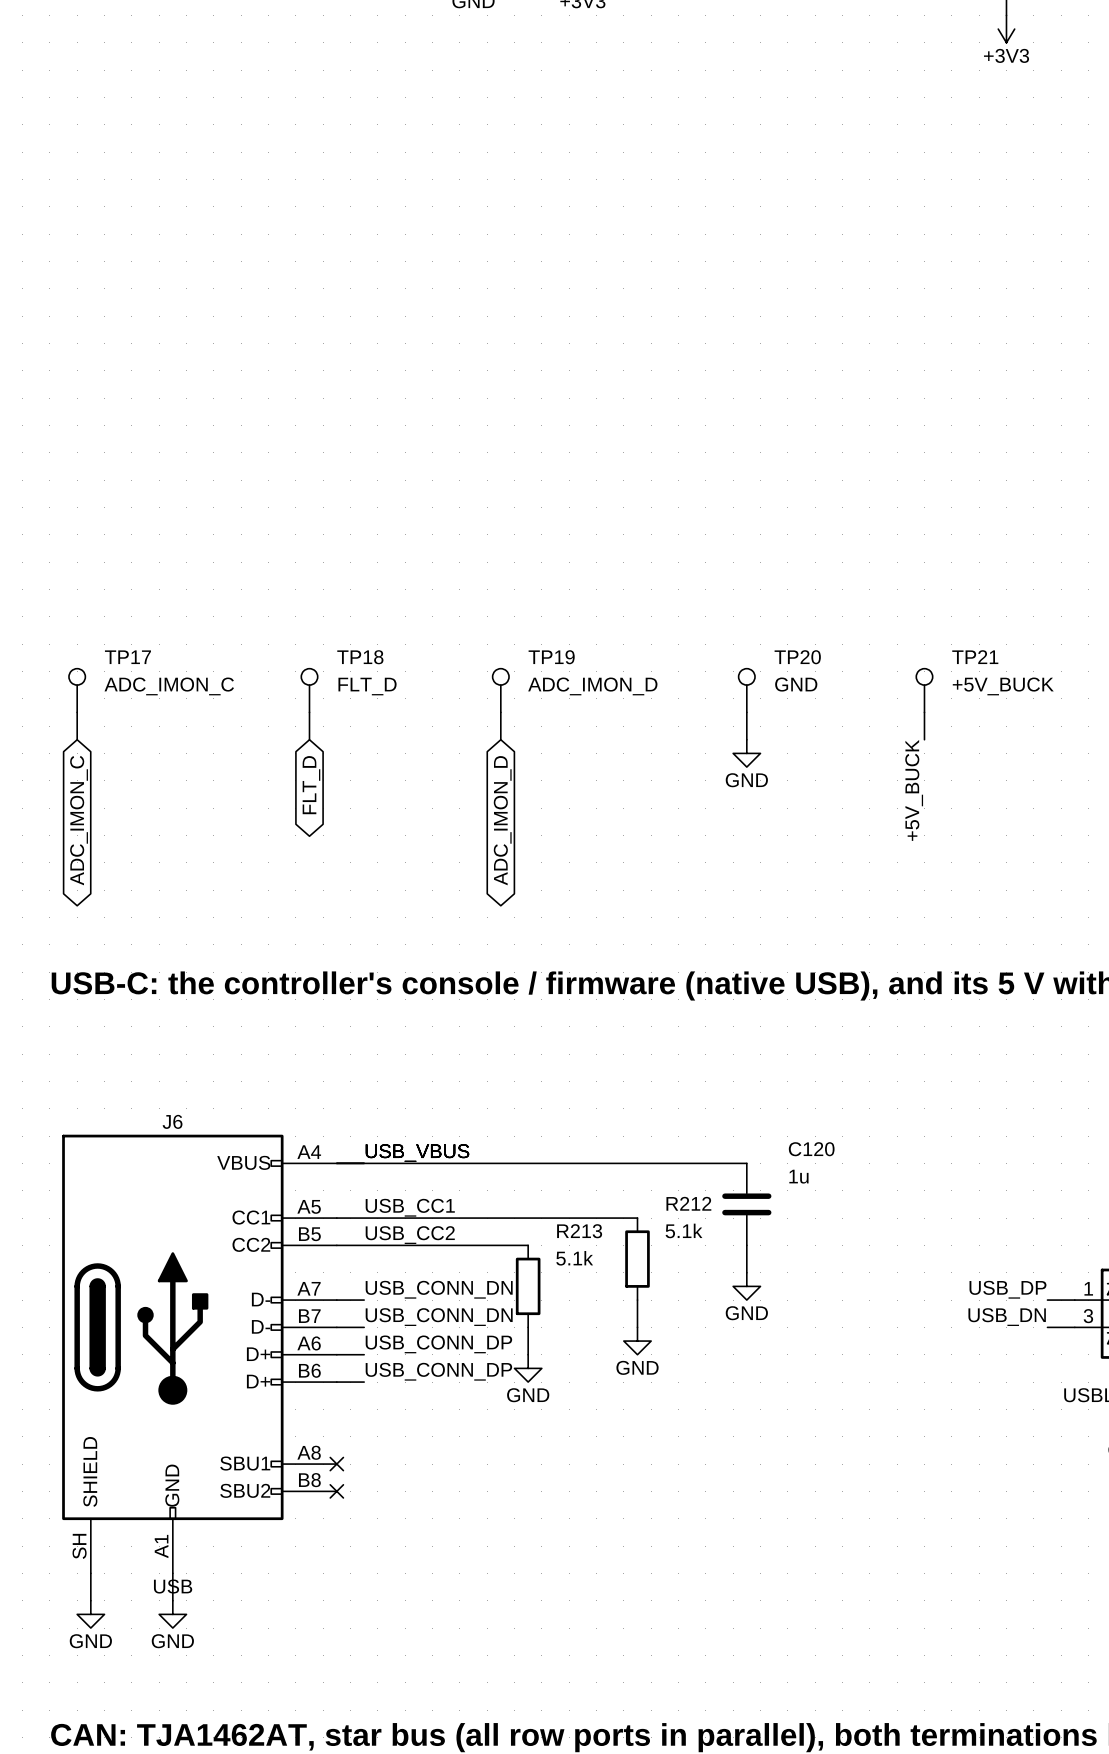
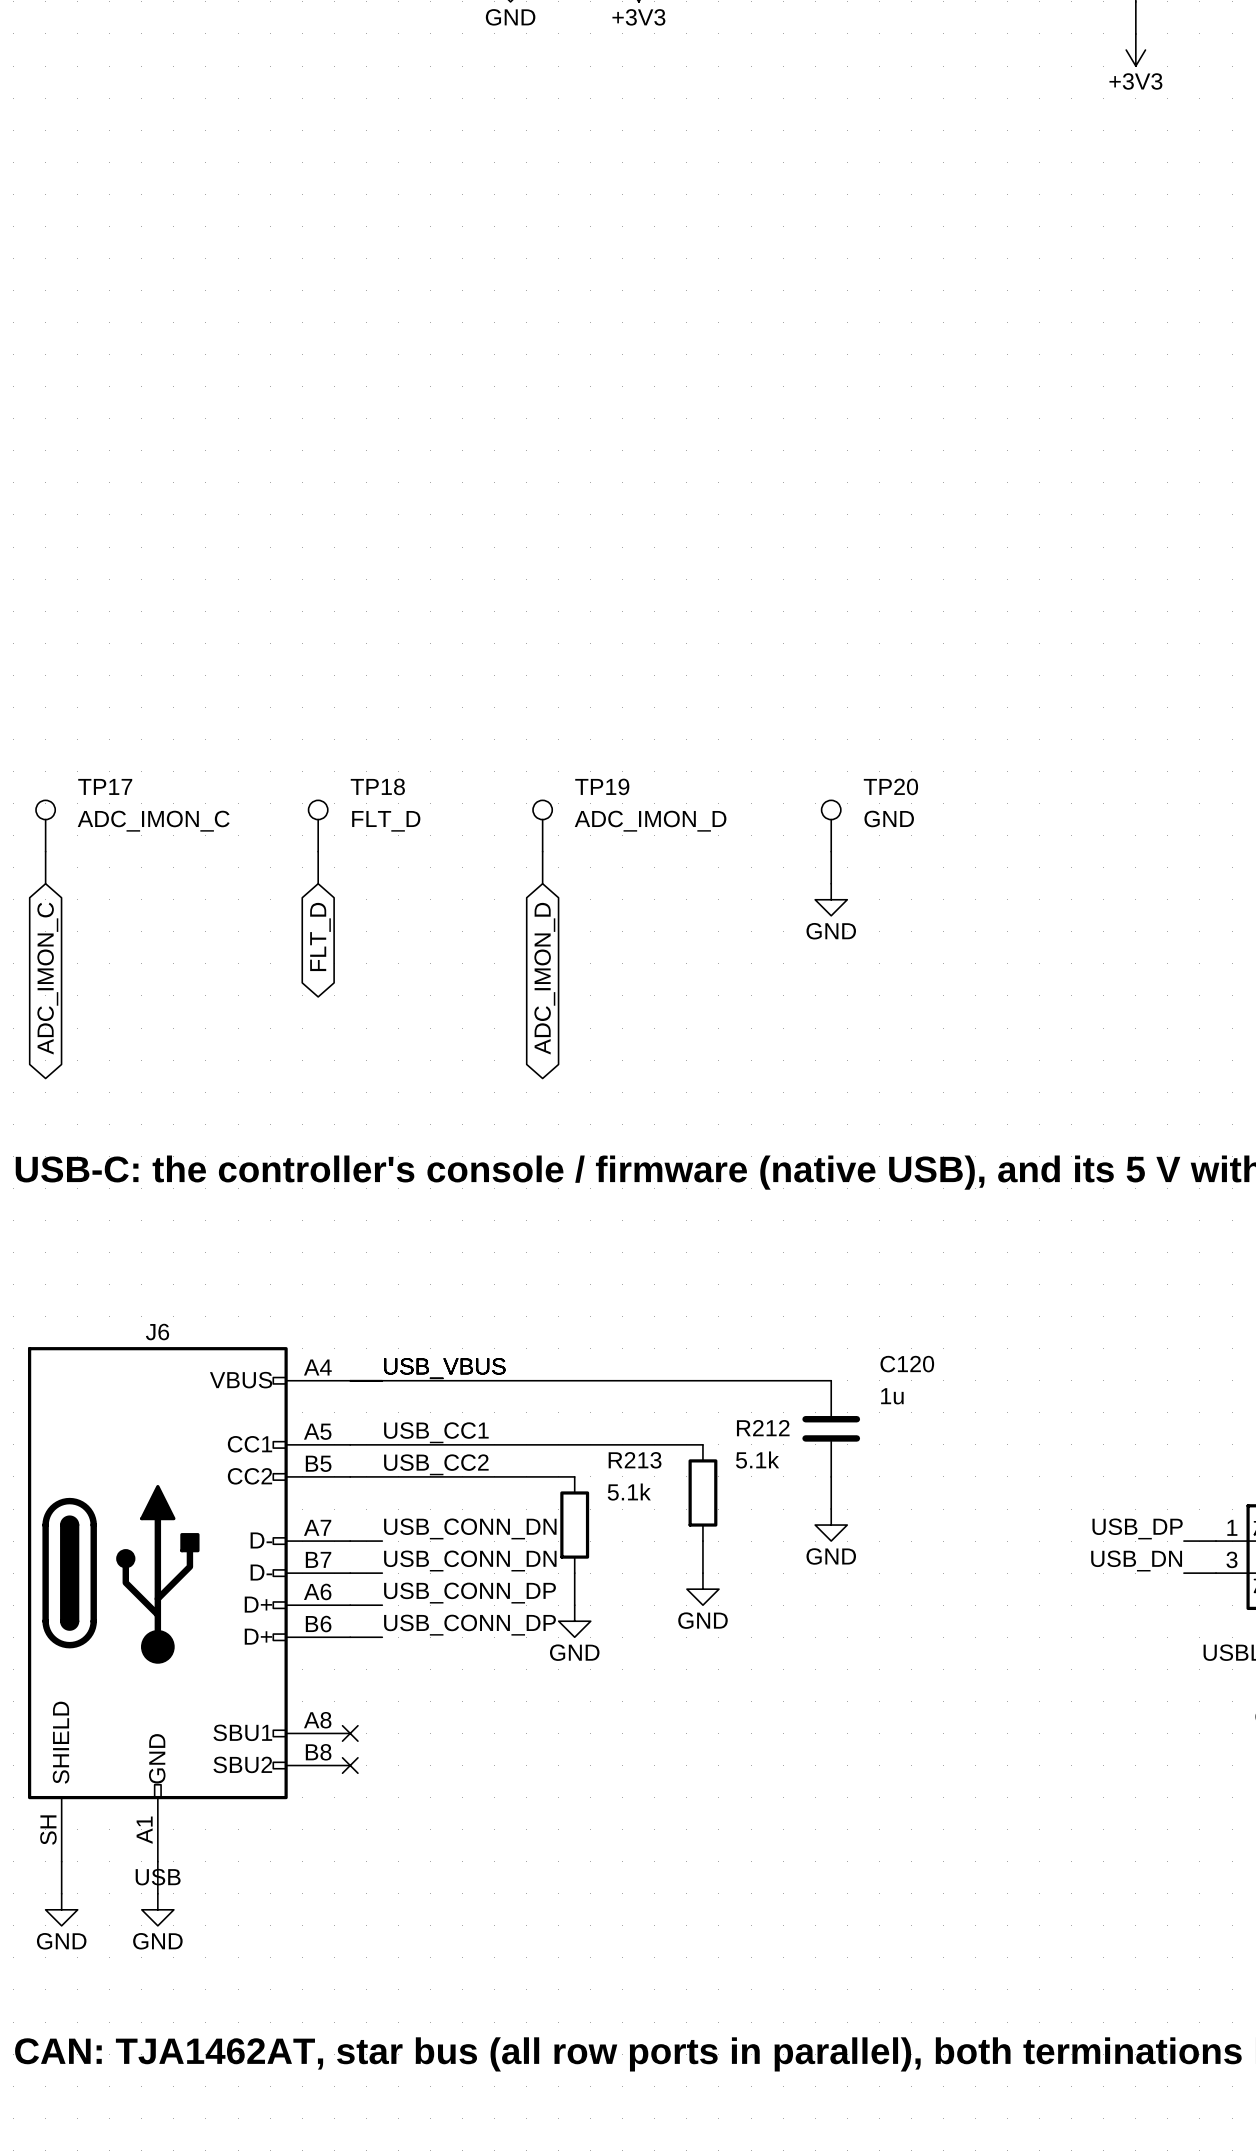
TP21: +5V_BUCK (924, 690) -> none
wire: (924, 712) (924, 739) -> none
label: +5V_BUCK (914, 790) -> none

